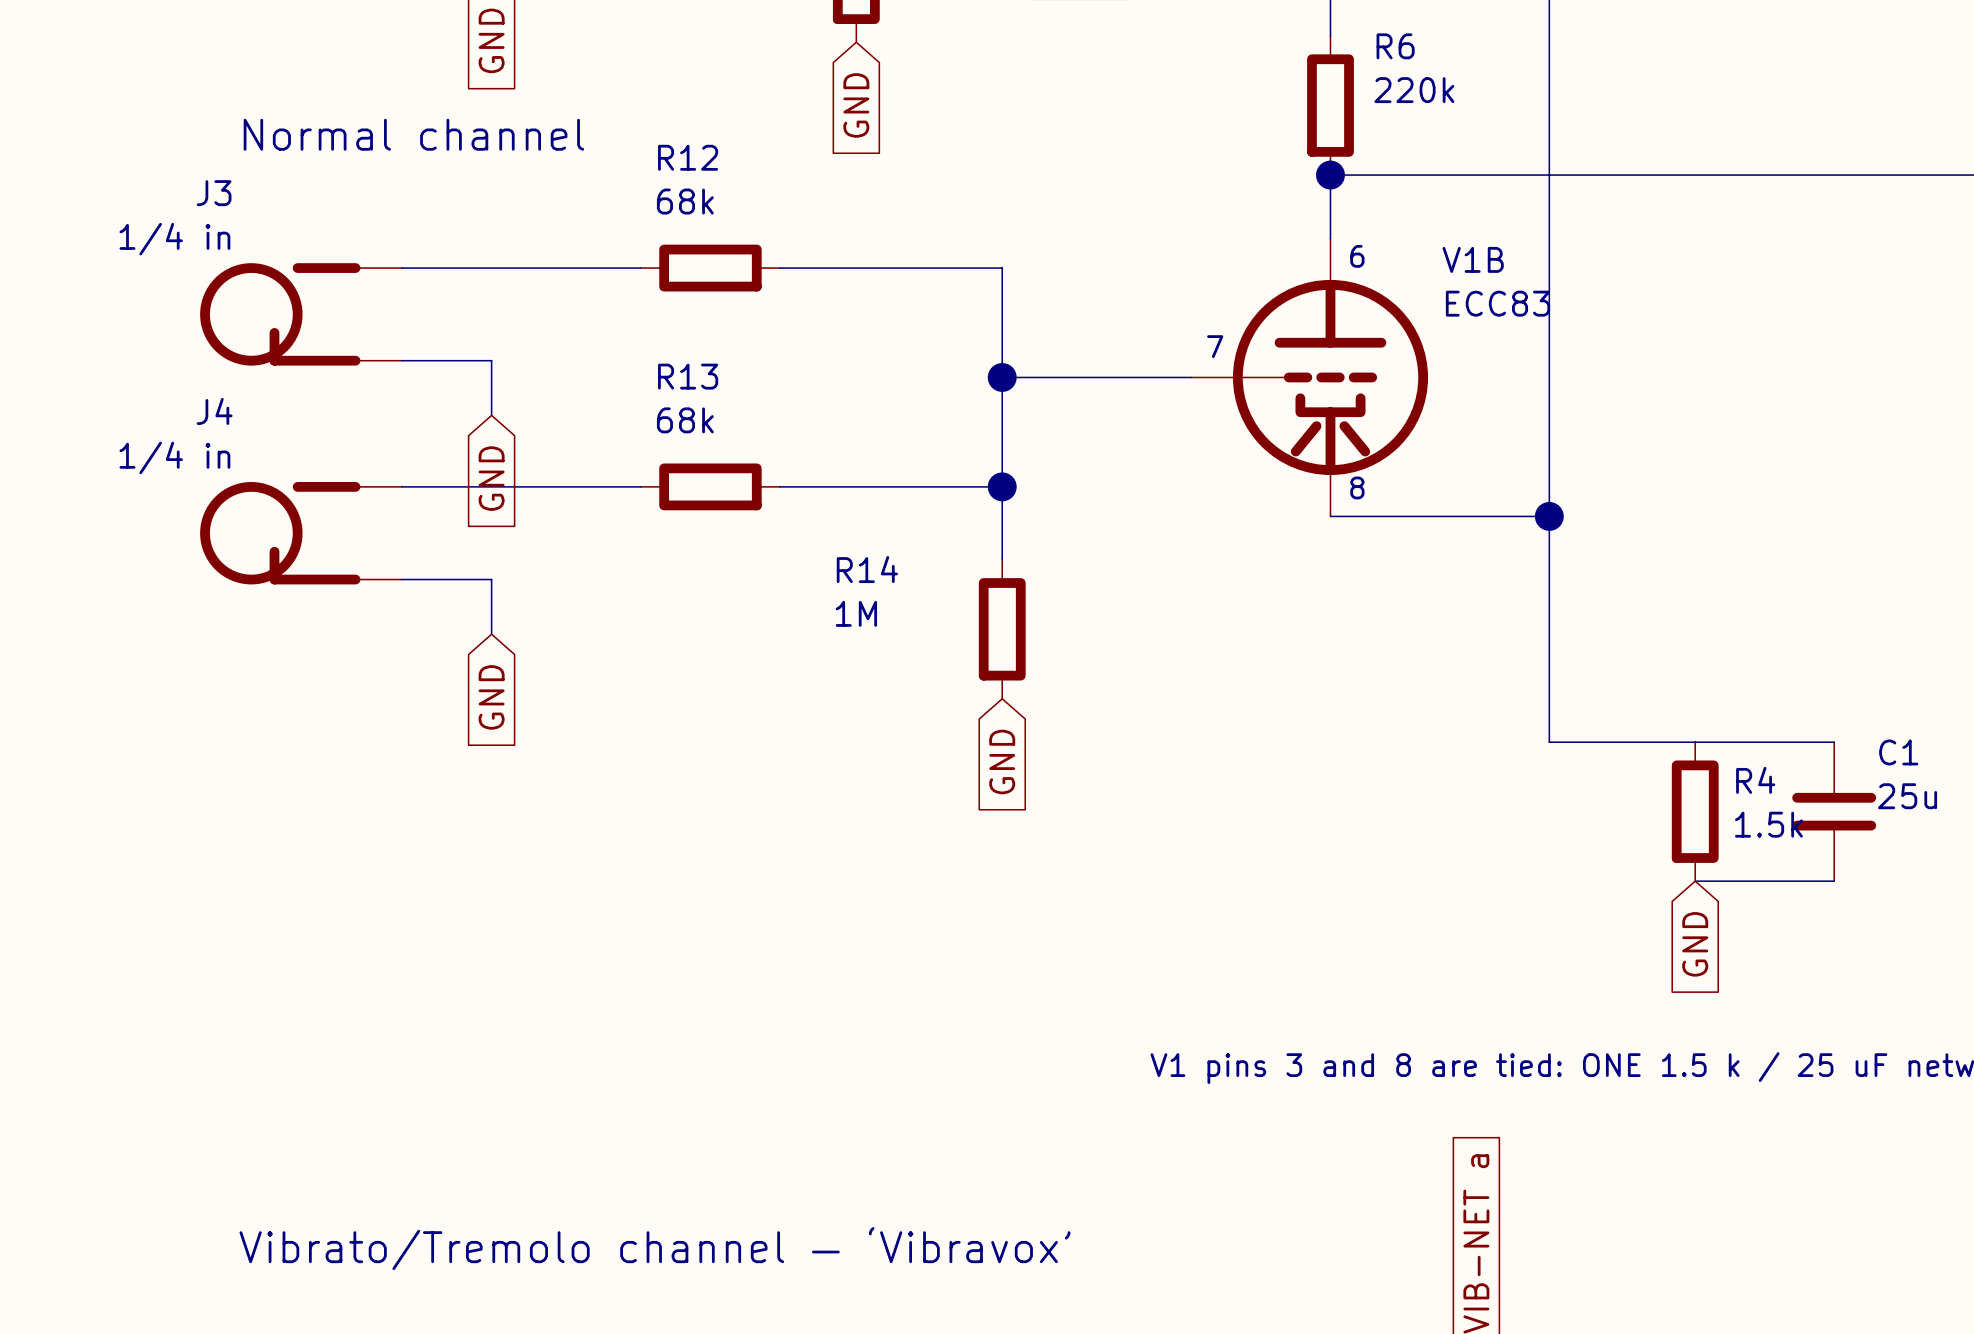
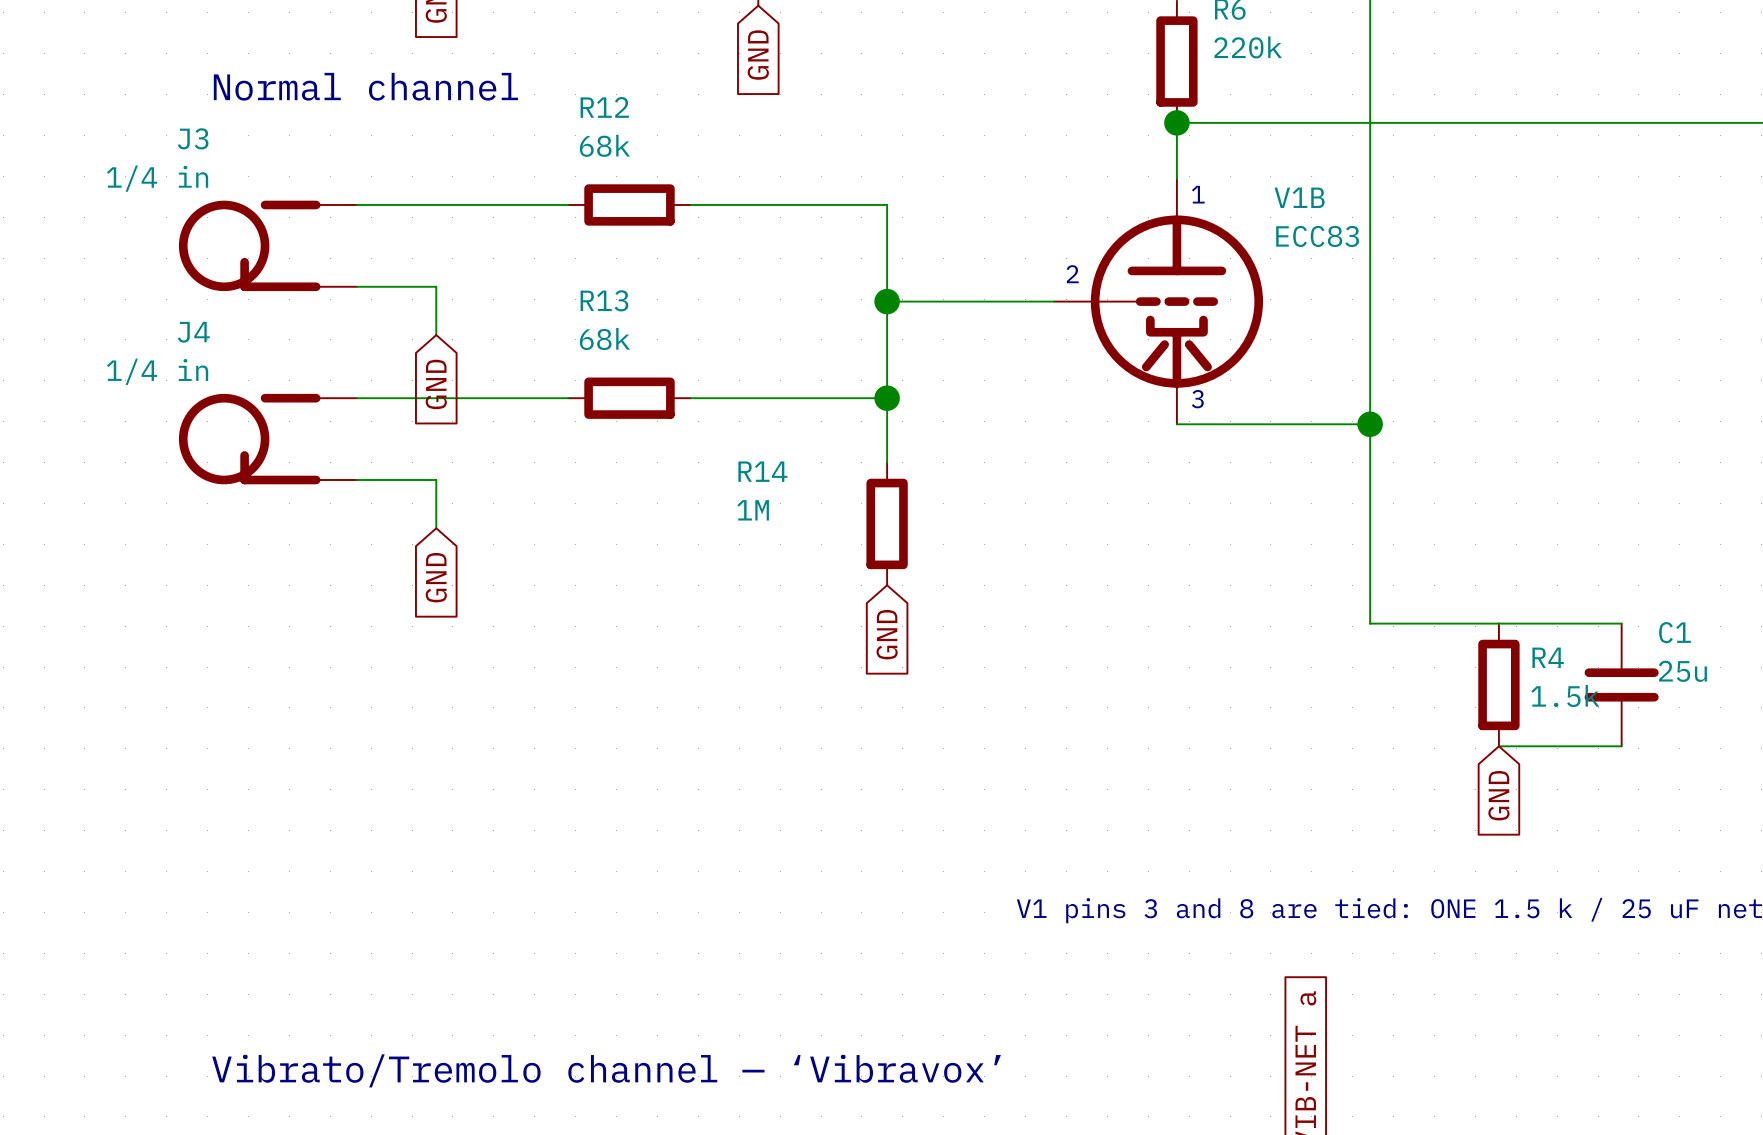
text: 6 (1357, 256) -> 1 (1198, 194)
text: 7 (1215, 346) -> 2 (1072, 274)
text: 8 (1357, 487) -> 3 (1197, 399)

